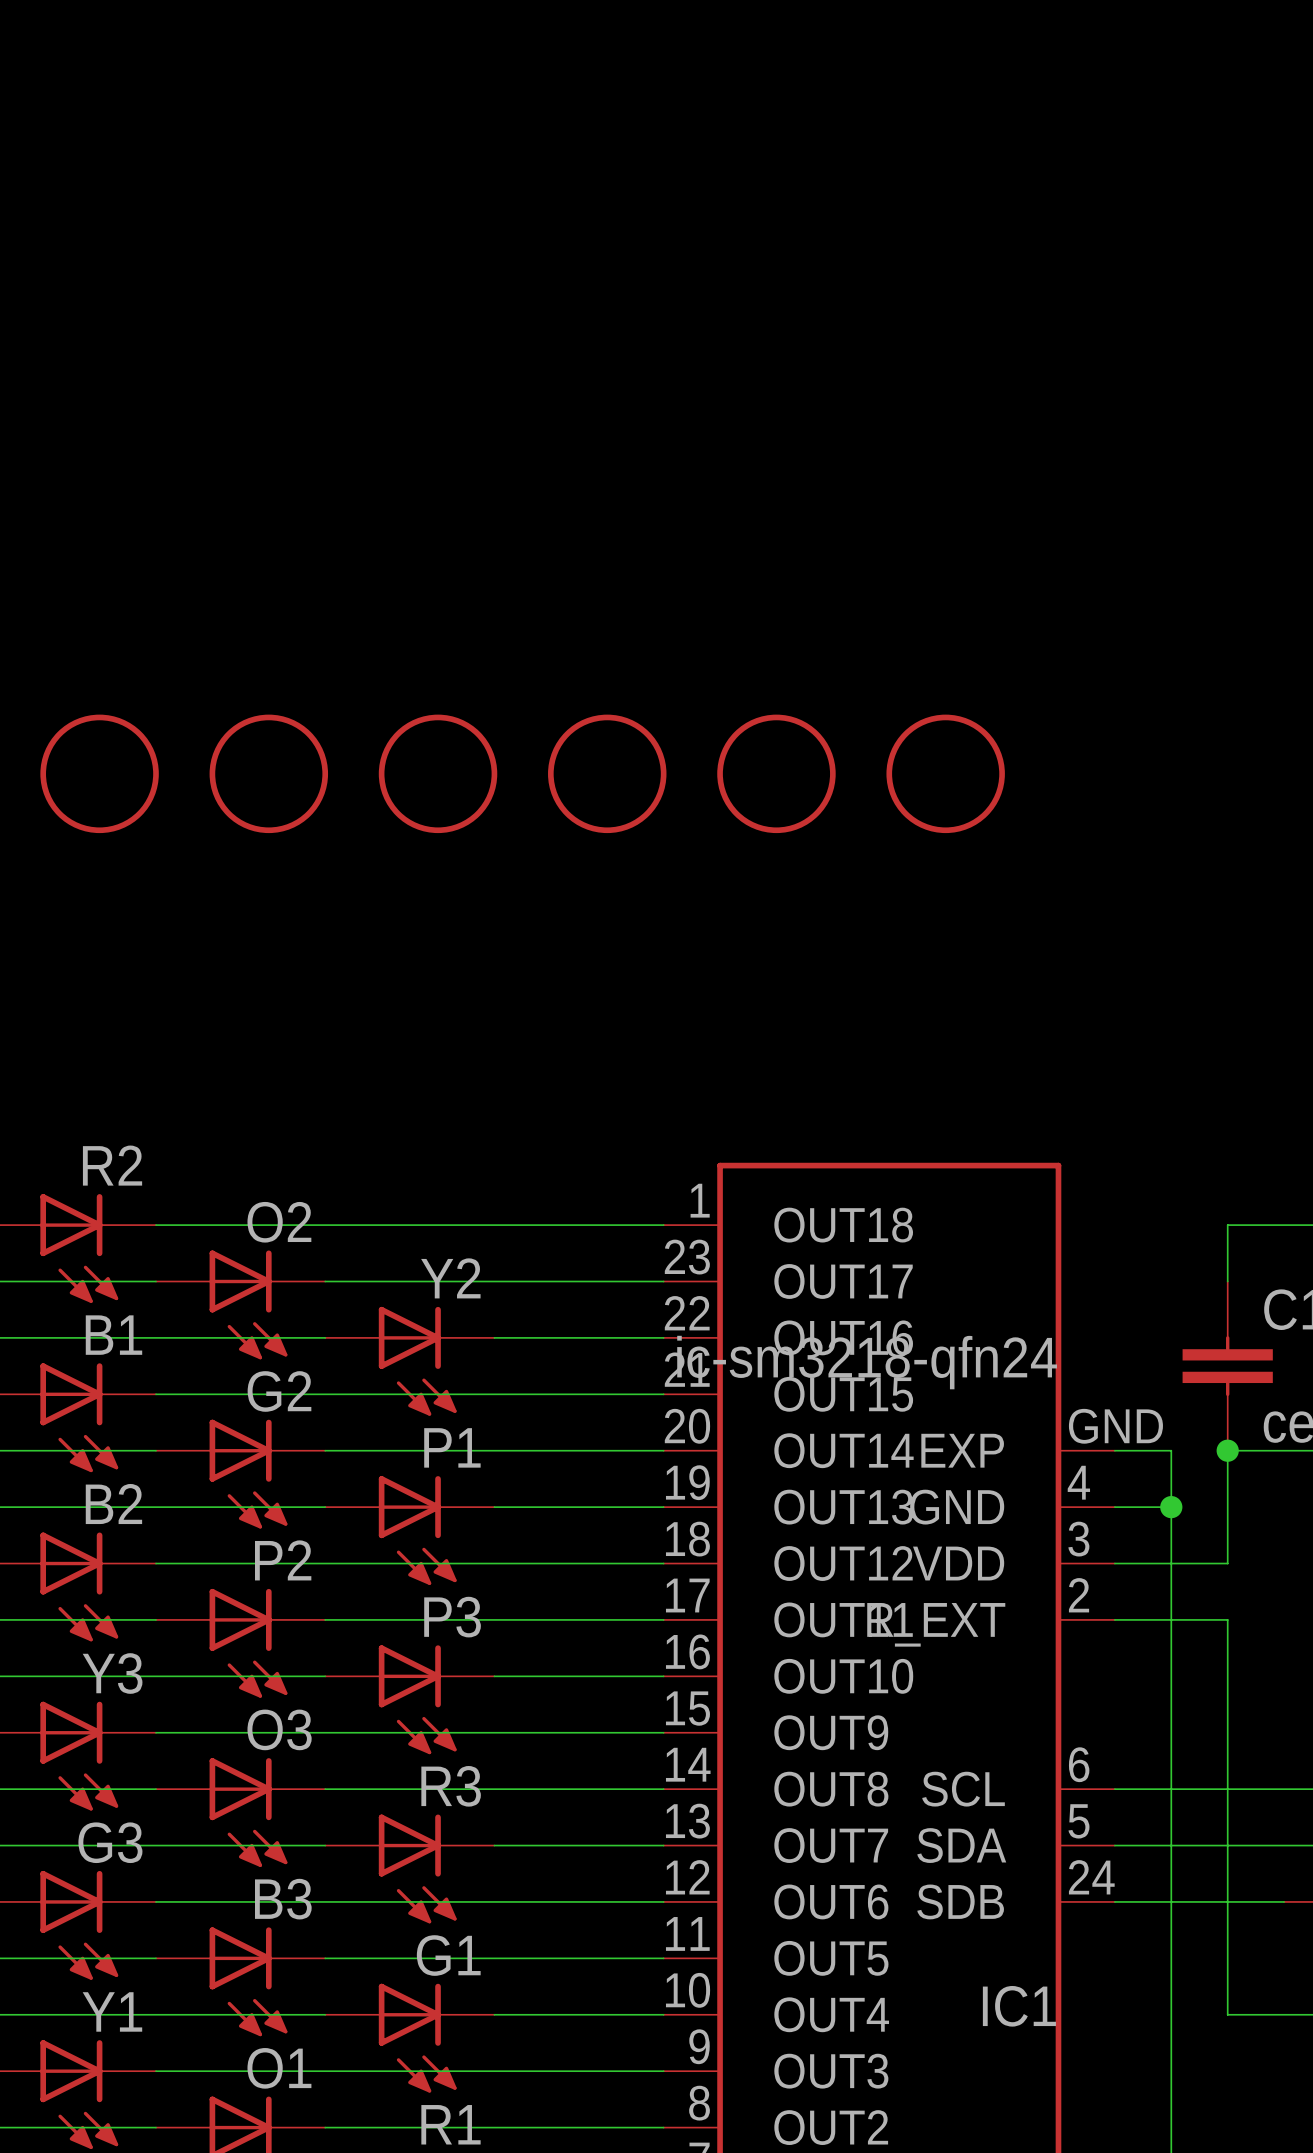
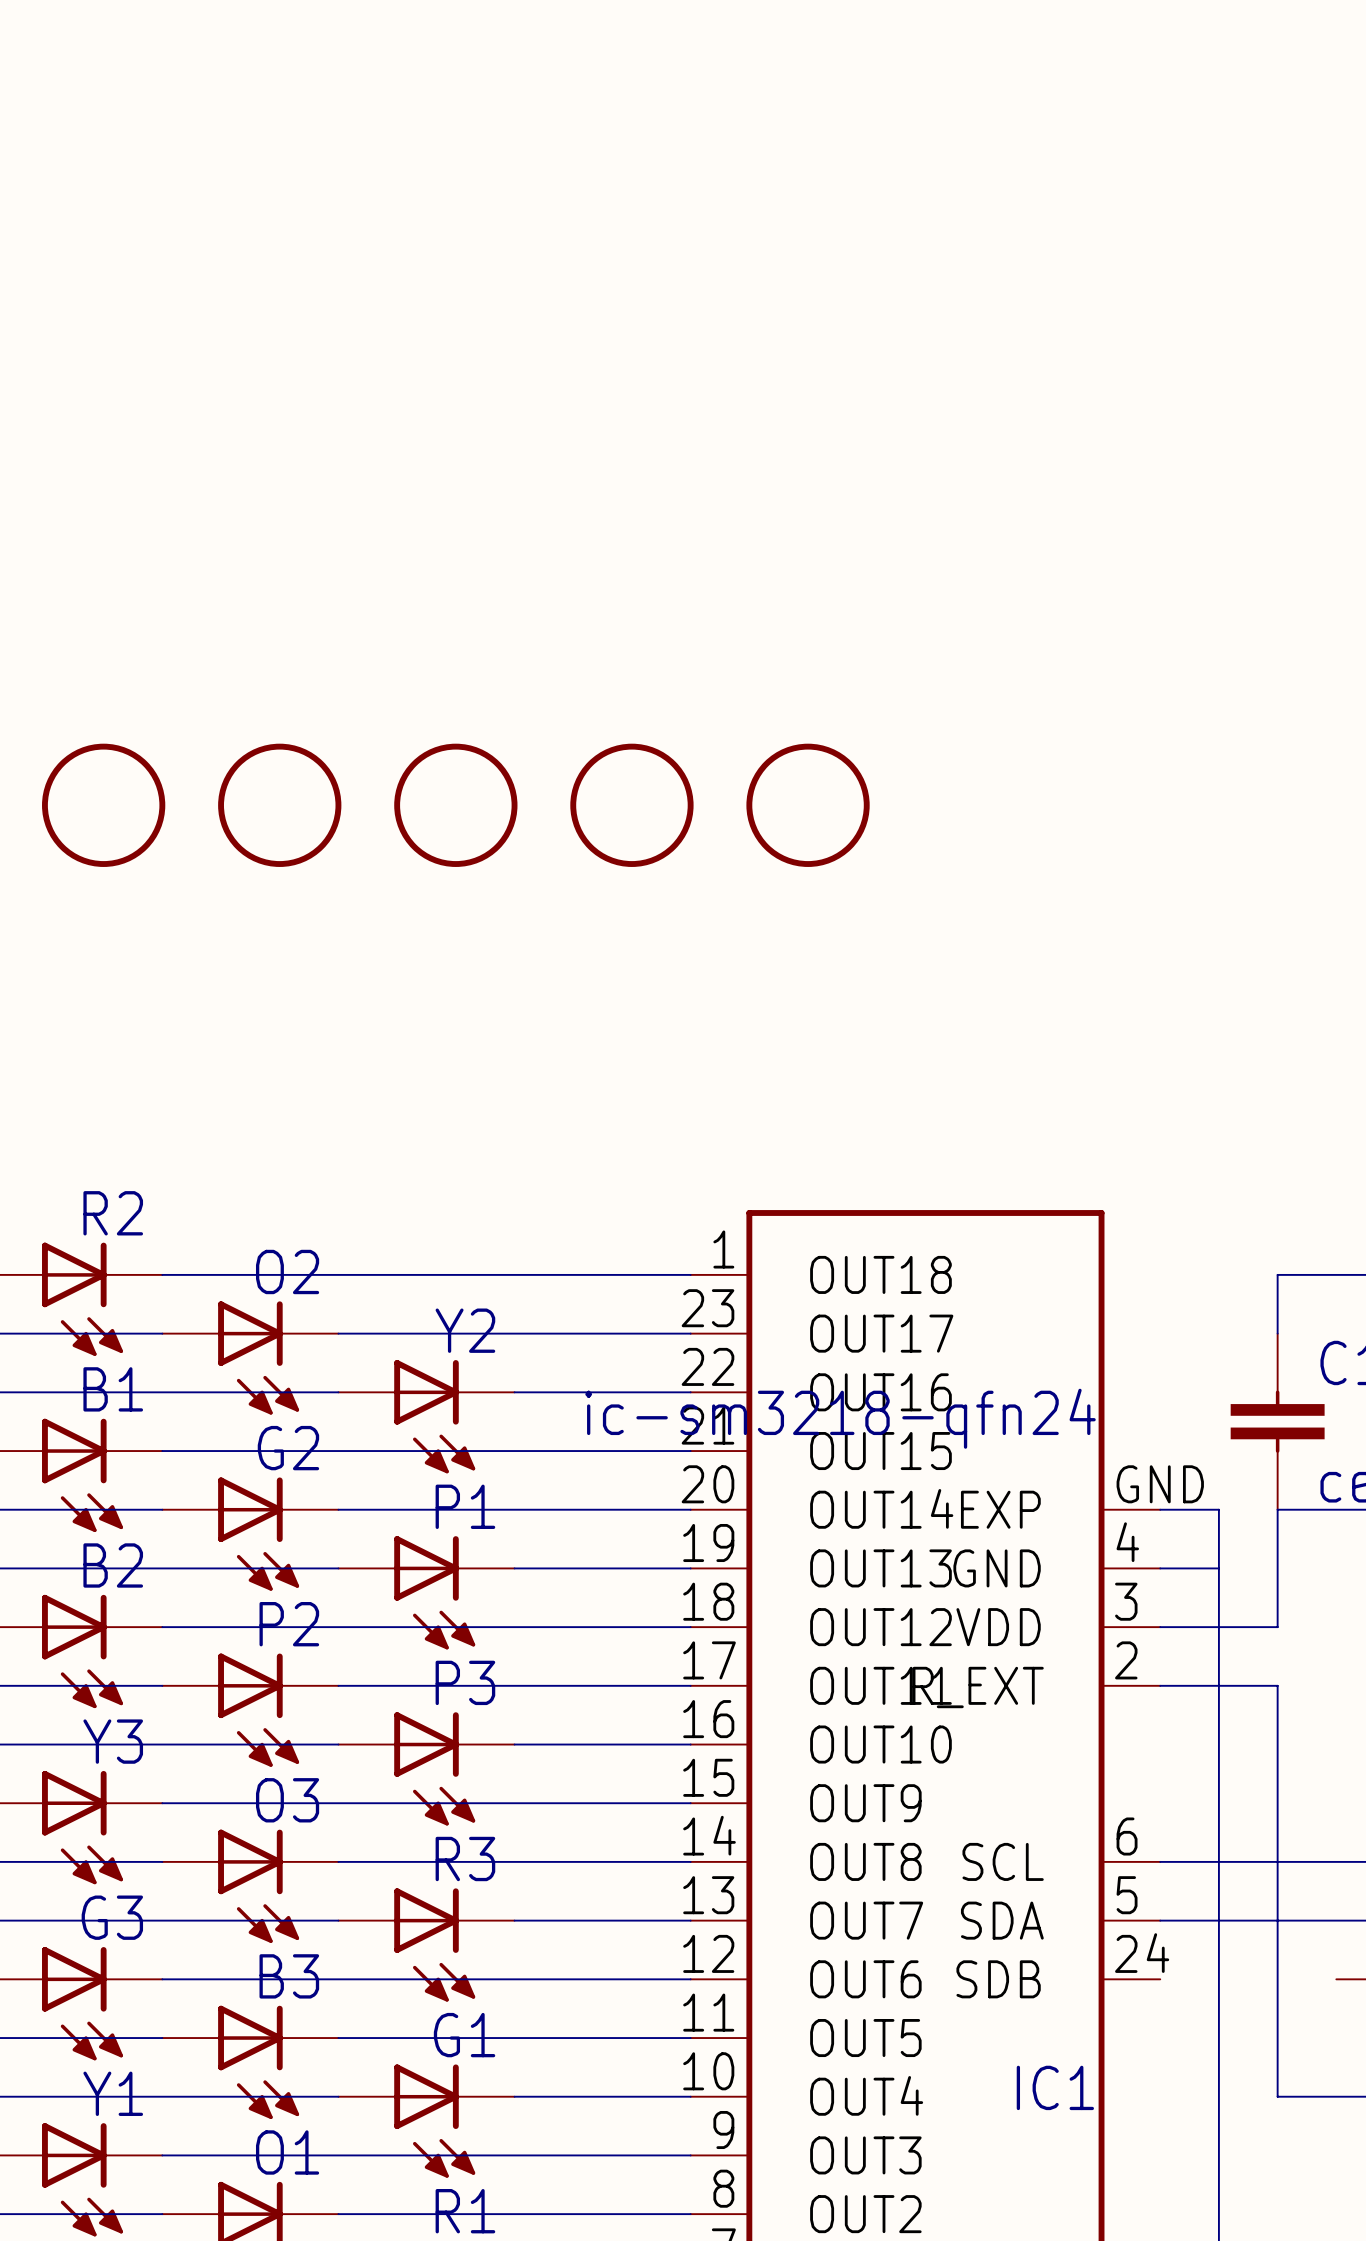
part: (945, 773) -> none
junction: (1227, 1450) -> none
junction: (1171, 1507) -> none
wire: (1114, 1901) (1284, 1901) -> none

